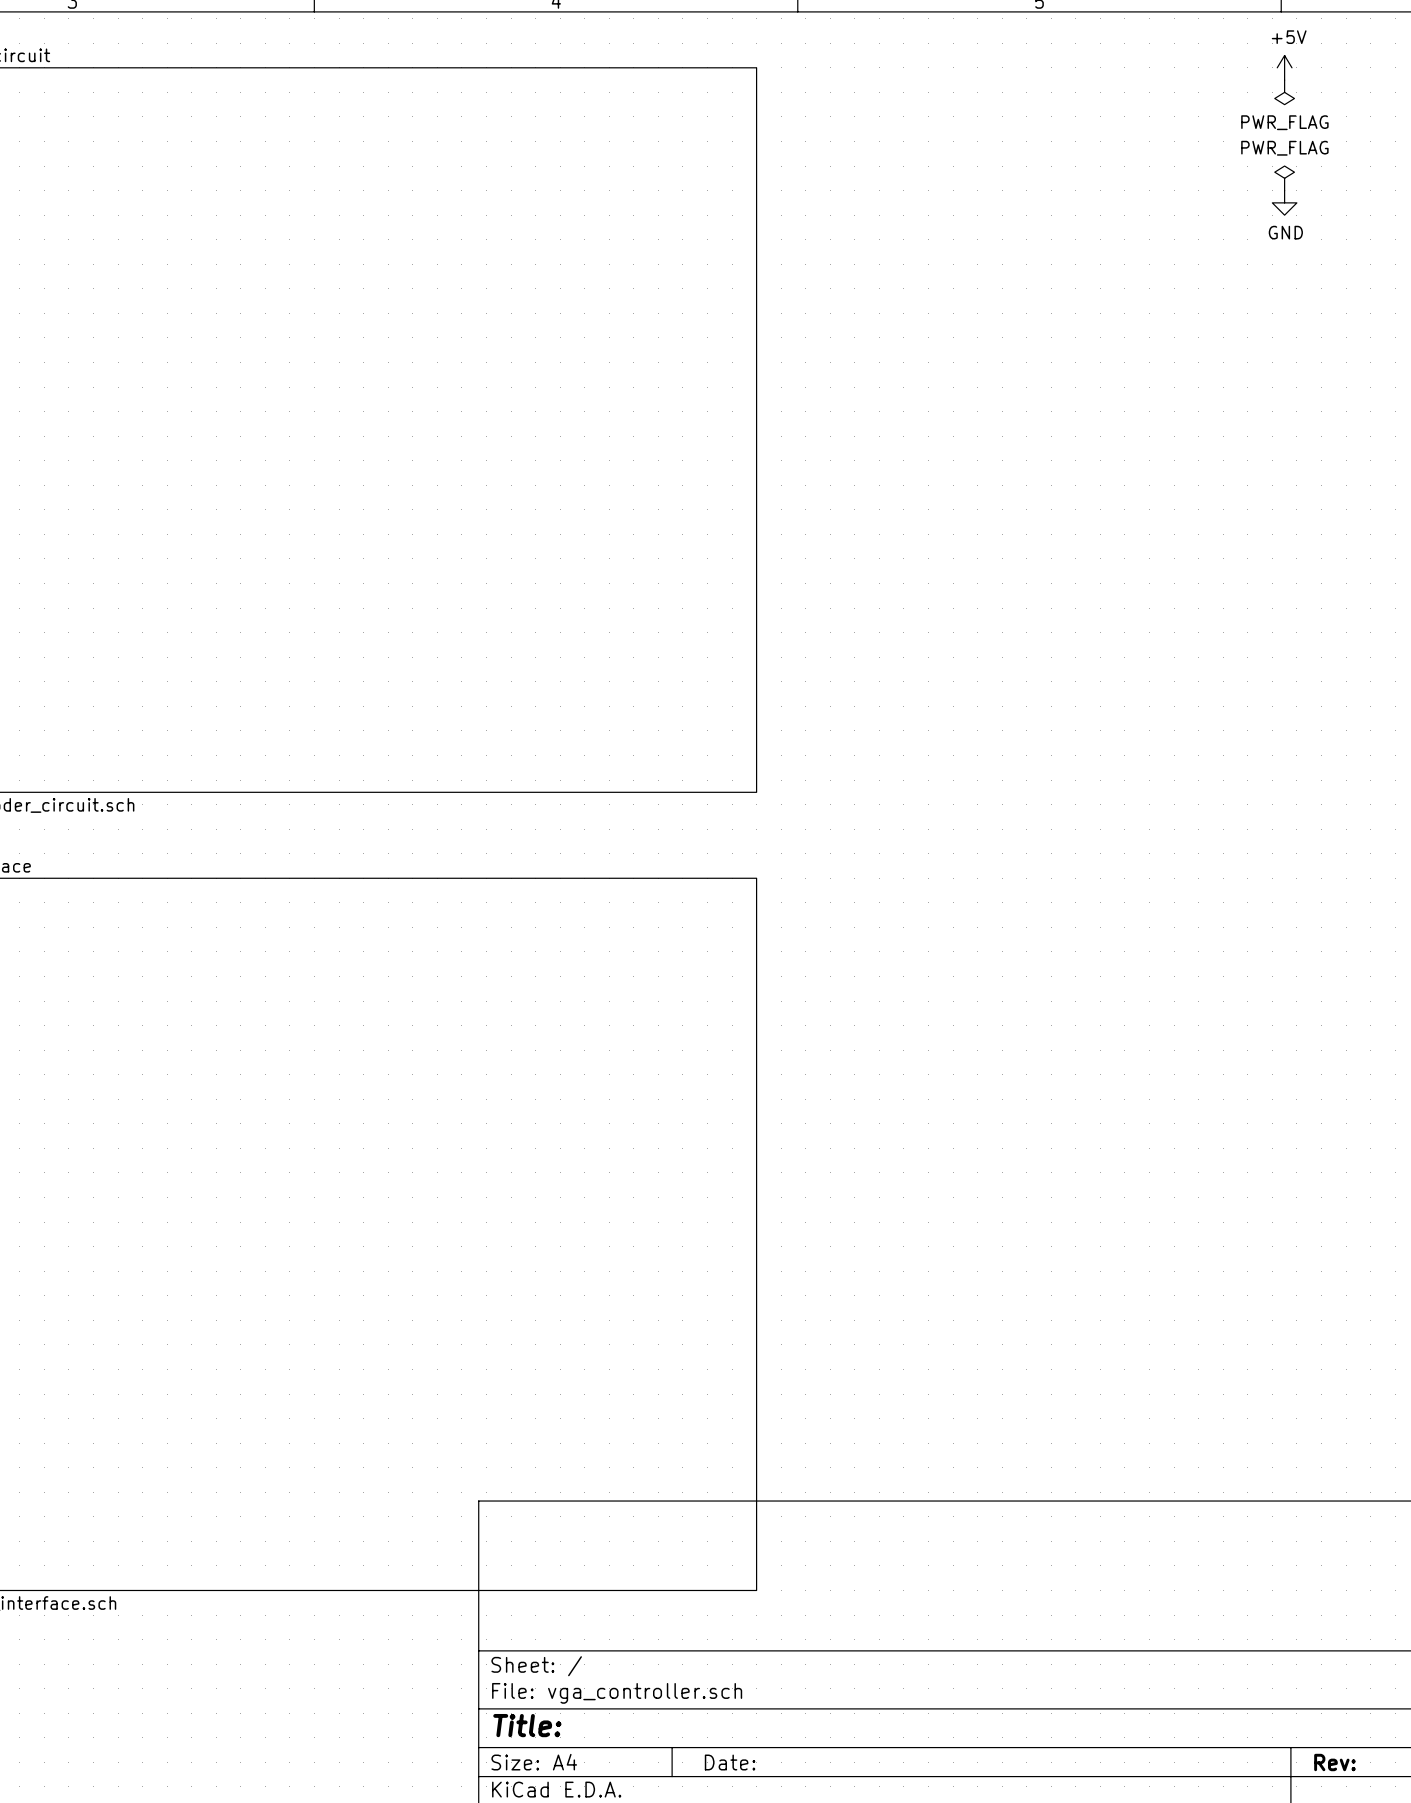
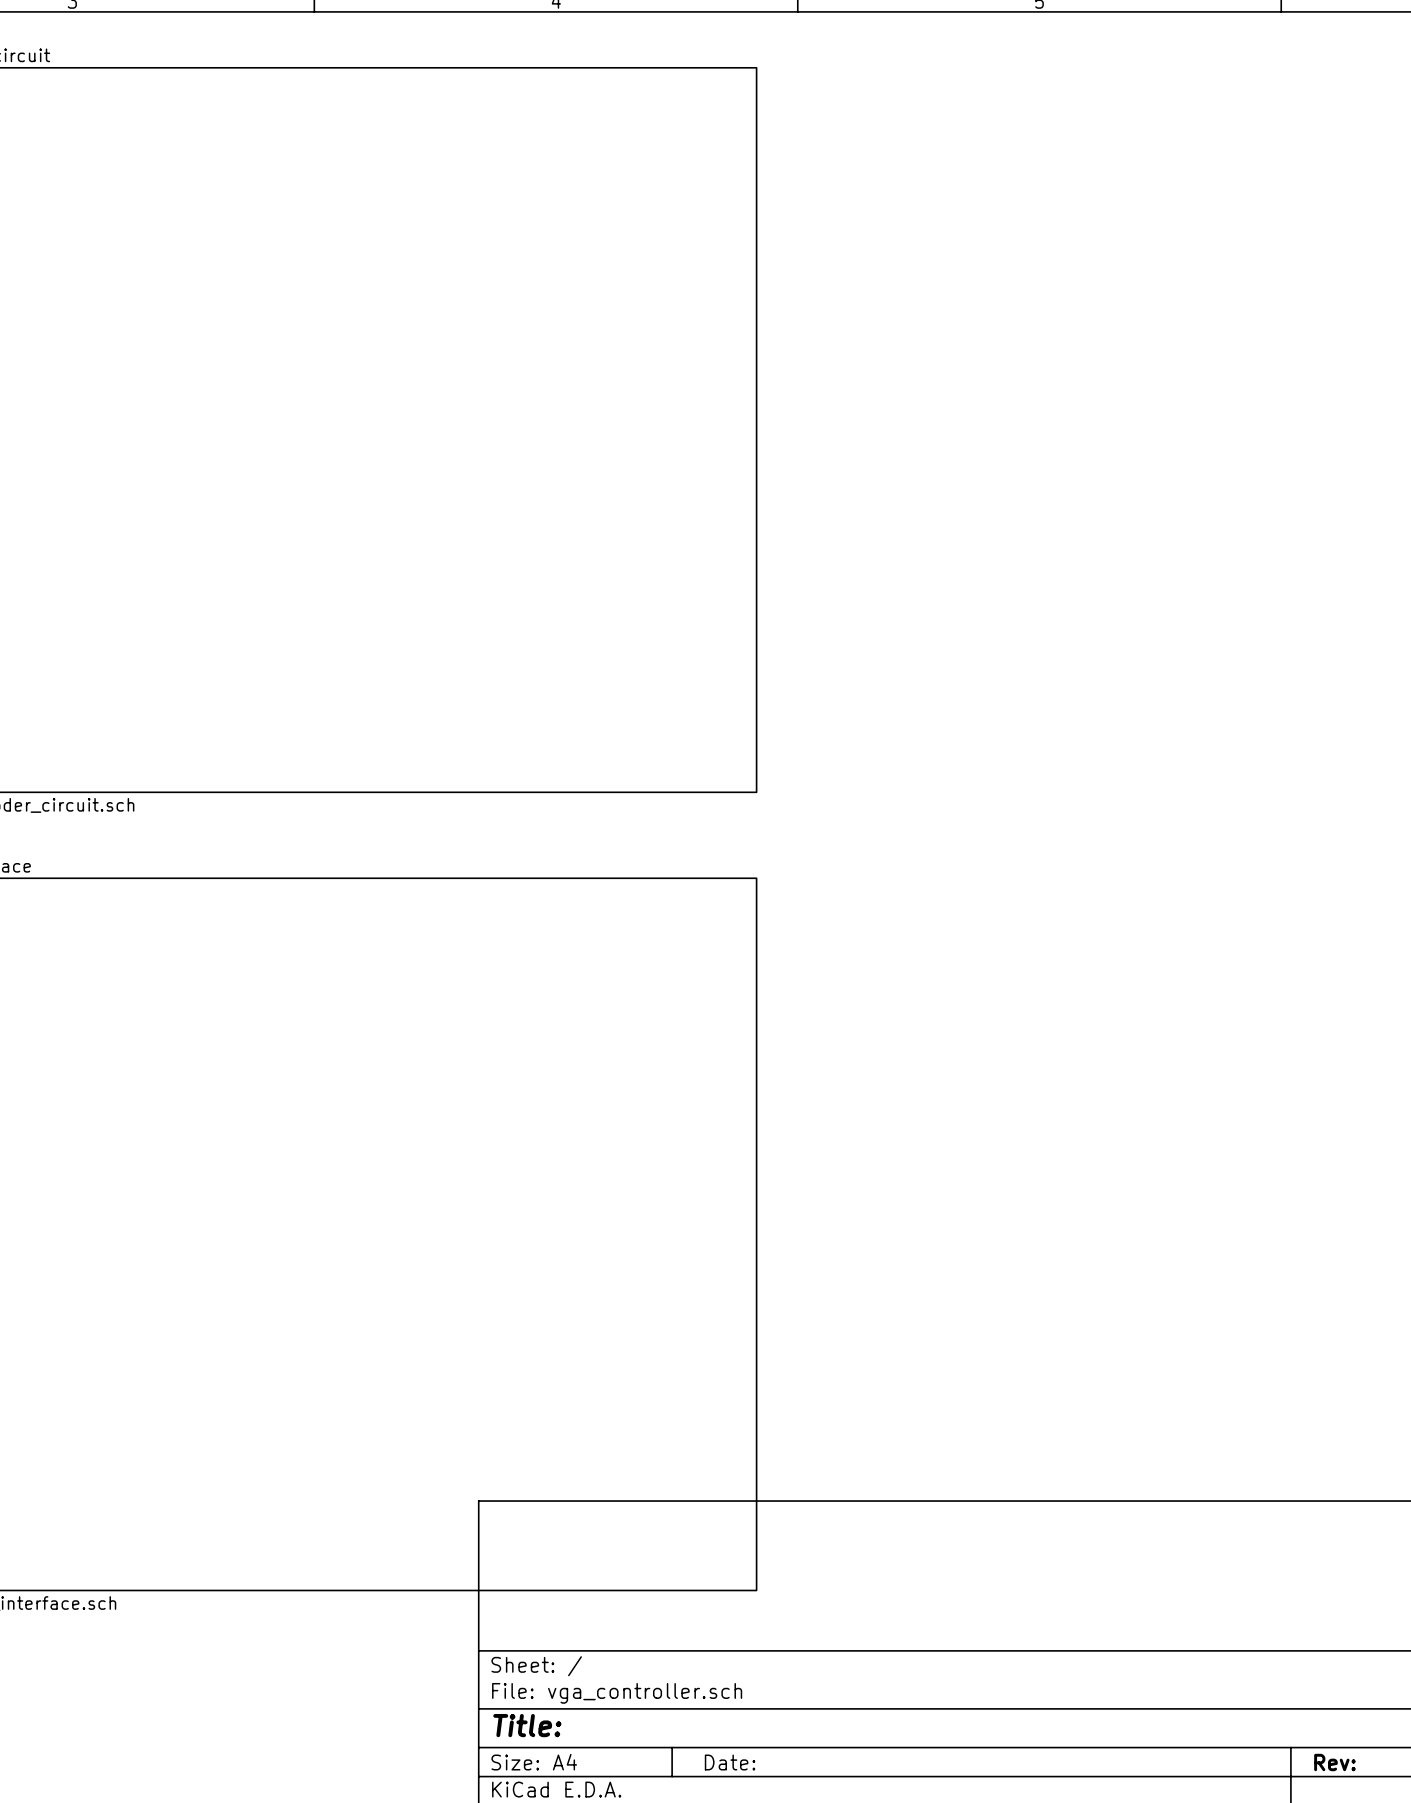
power symbol: +5V (1284, 67) -> none
power symbol: PWR_FLAG (1284, 92) -> none
power symbol: PWR_FLAG (1284, 178) -> none
power symbol: GND (1284, 202) -> none

